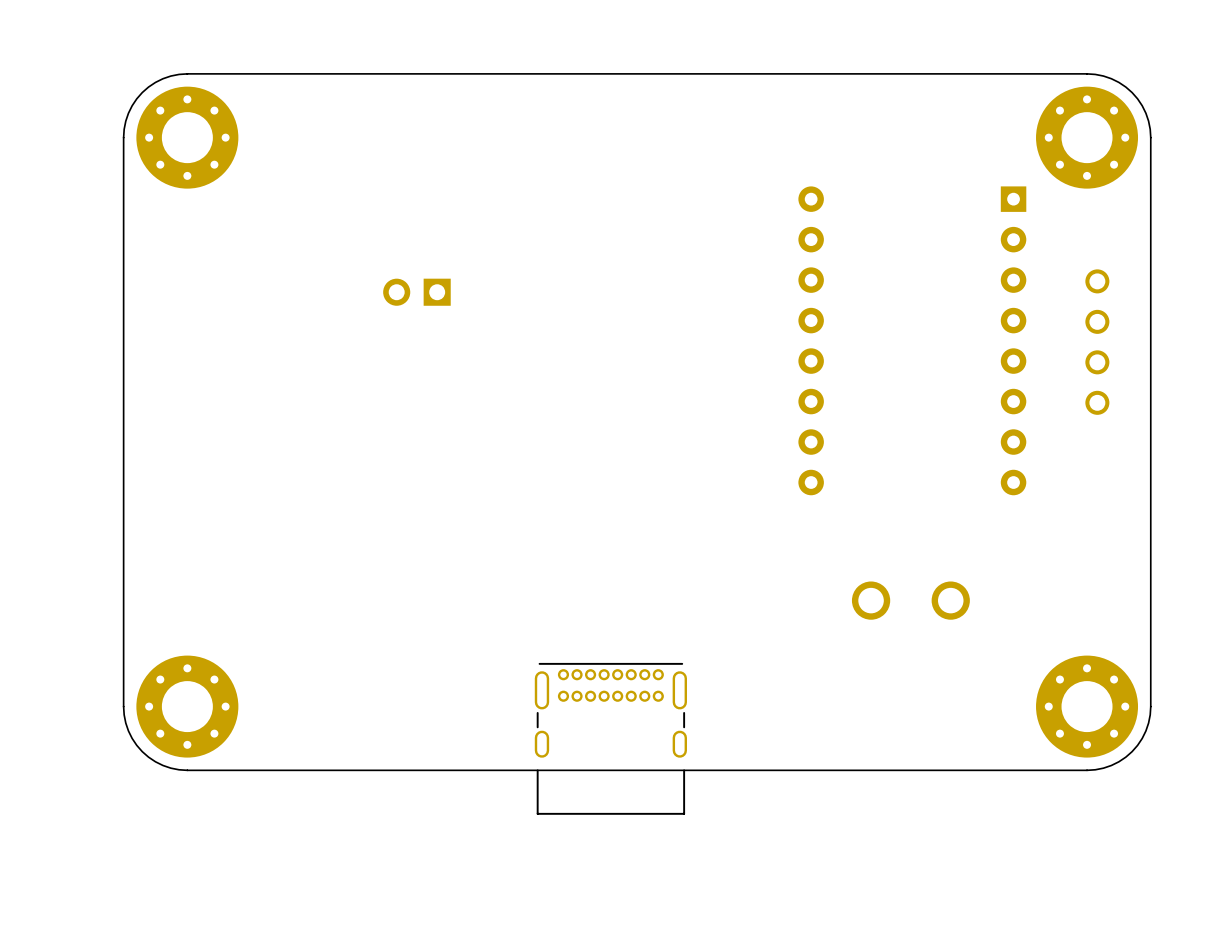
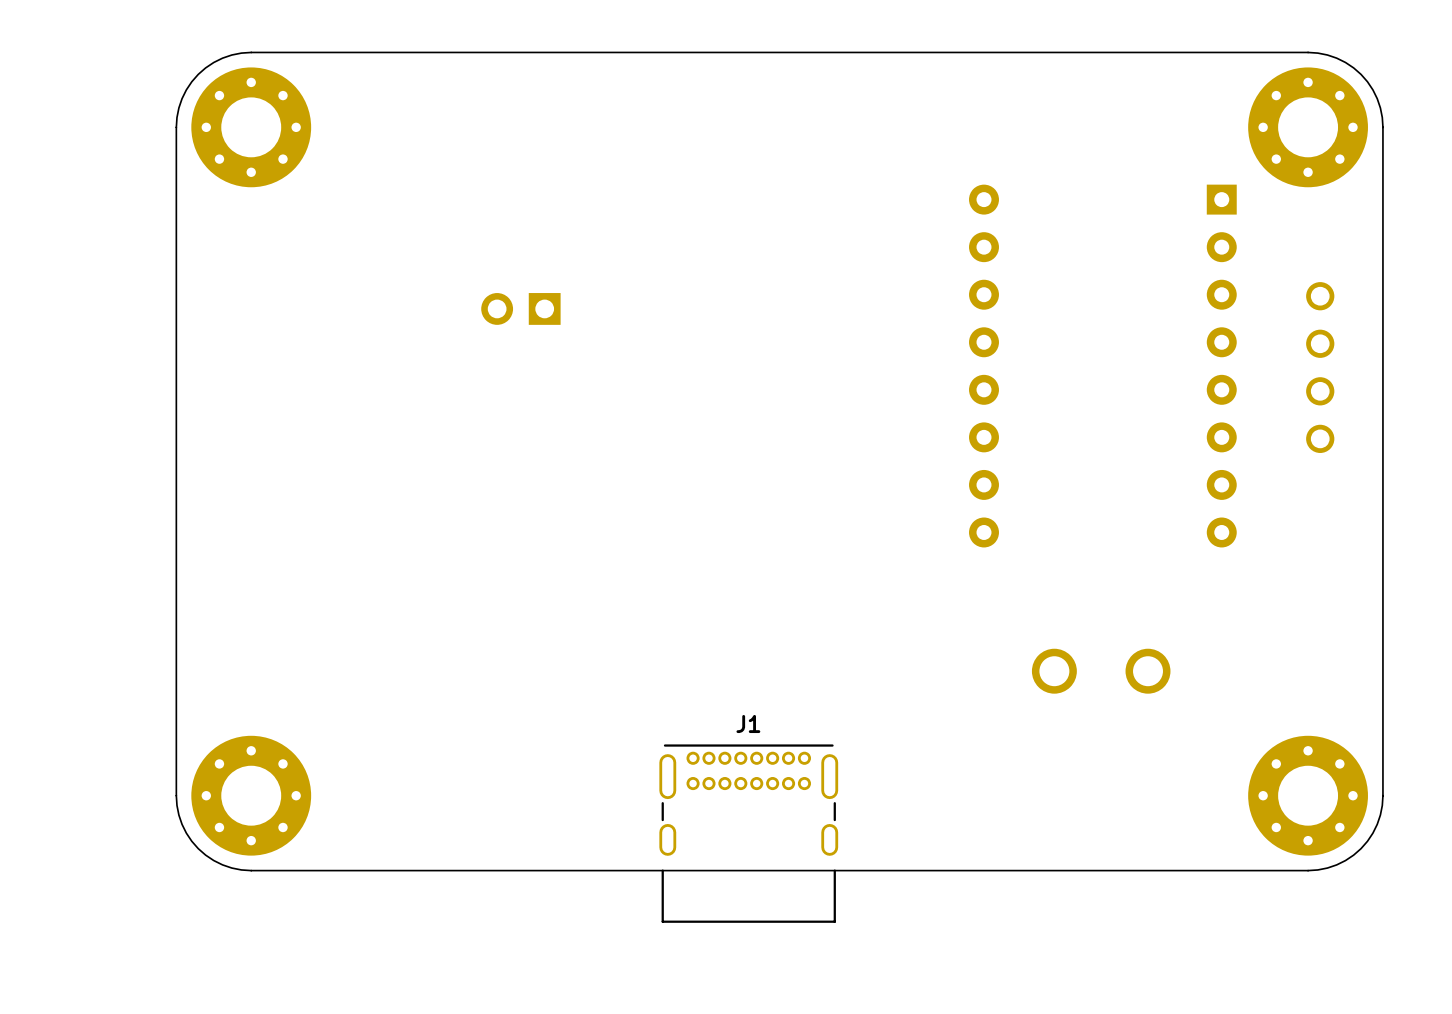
J1 name: none -> J1 (748, 724)

